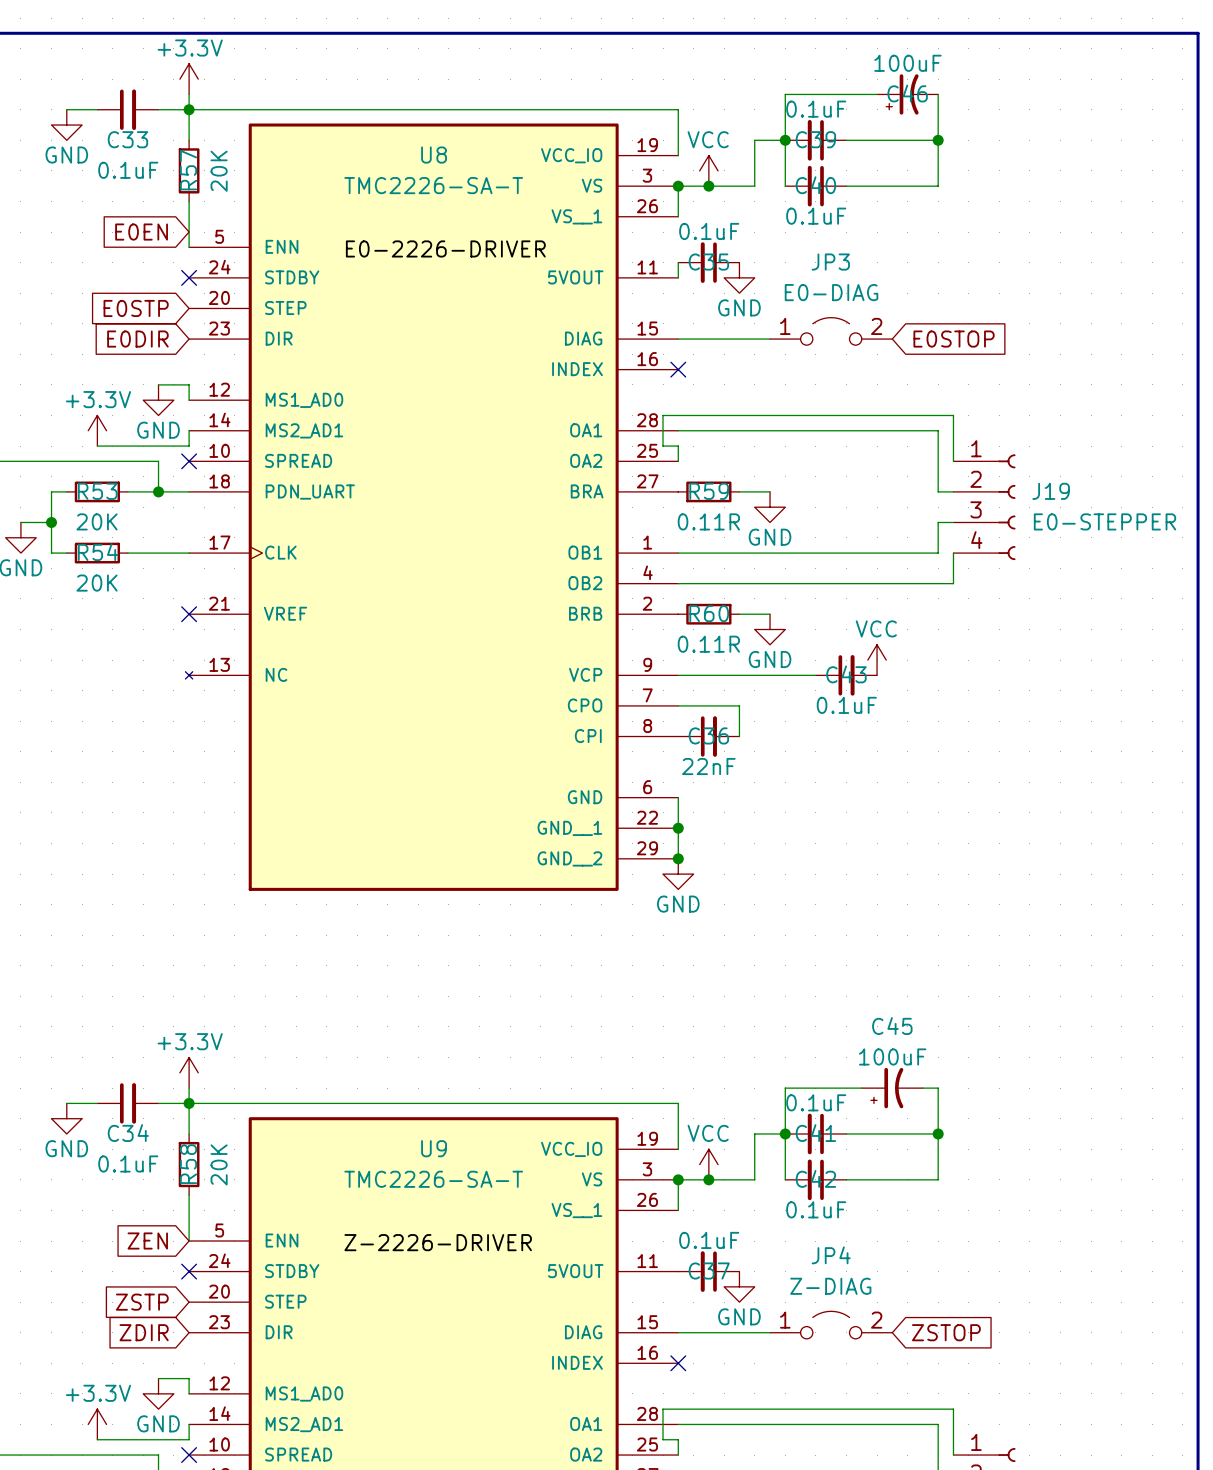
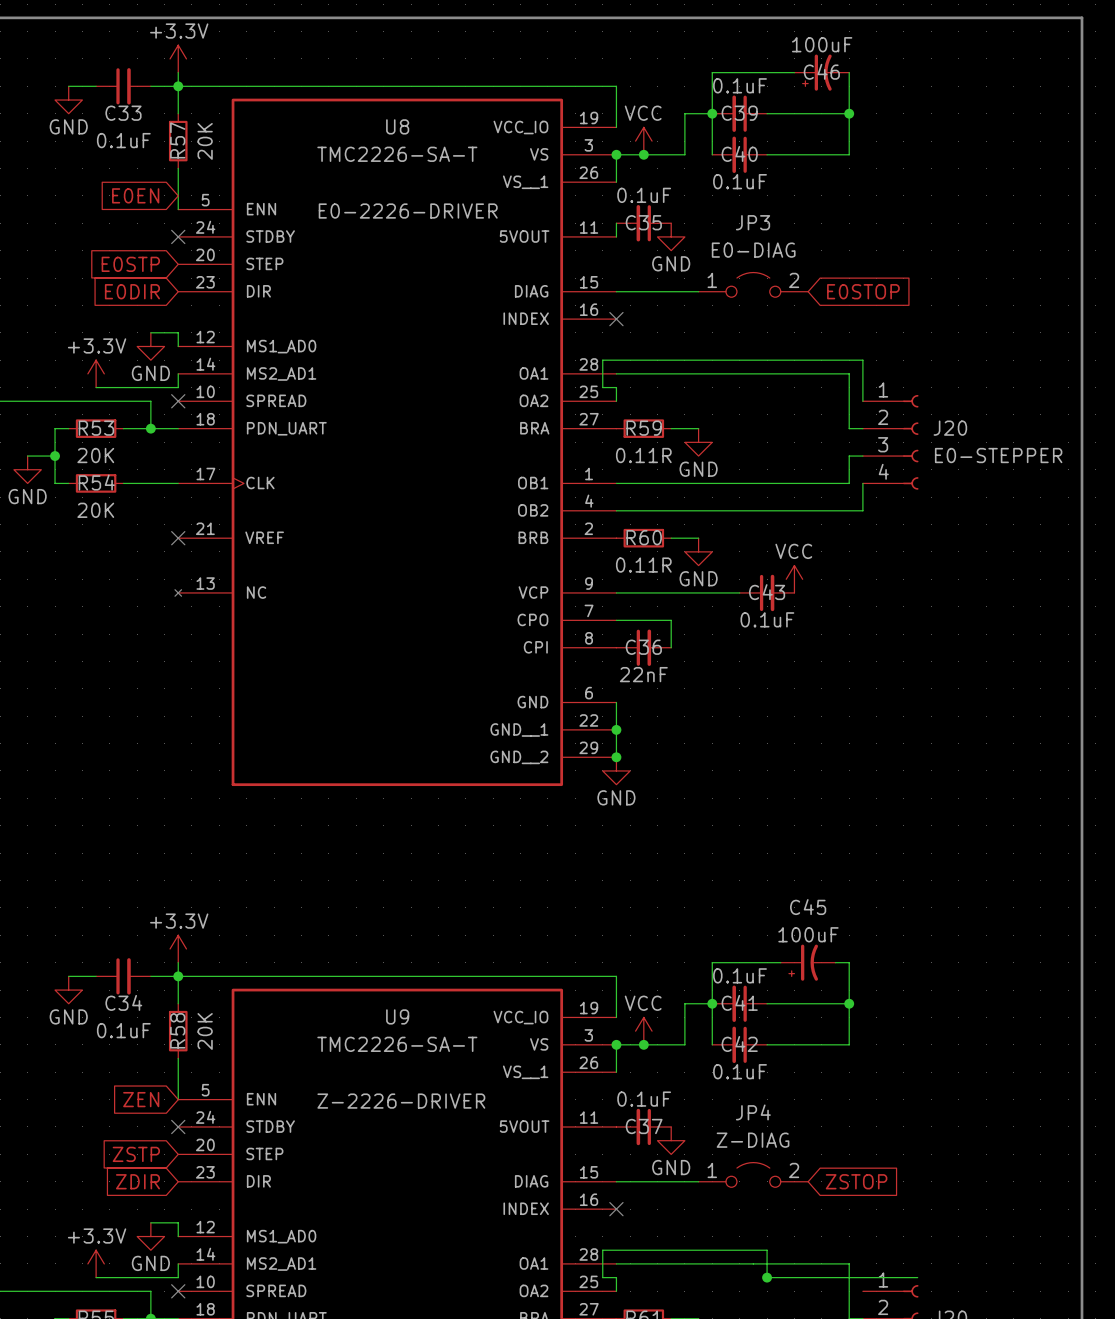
J19 name: J19 (1051, 491) -> J20 (950, 428)
wire: (846, 1409) (953, 1409) (953, 1455) -> (767, 1250) (767, 1277) (917, 1277)
junction: none -> (767, 1277)

